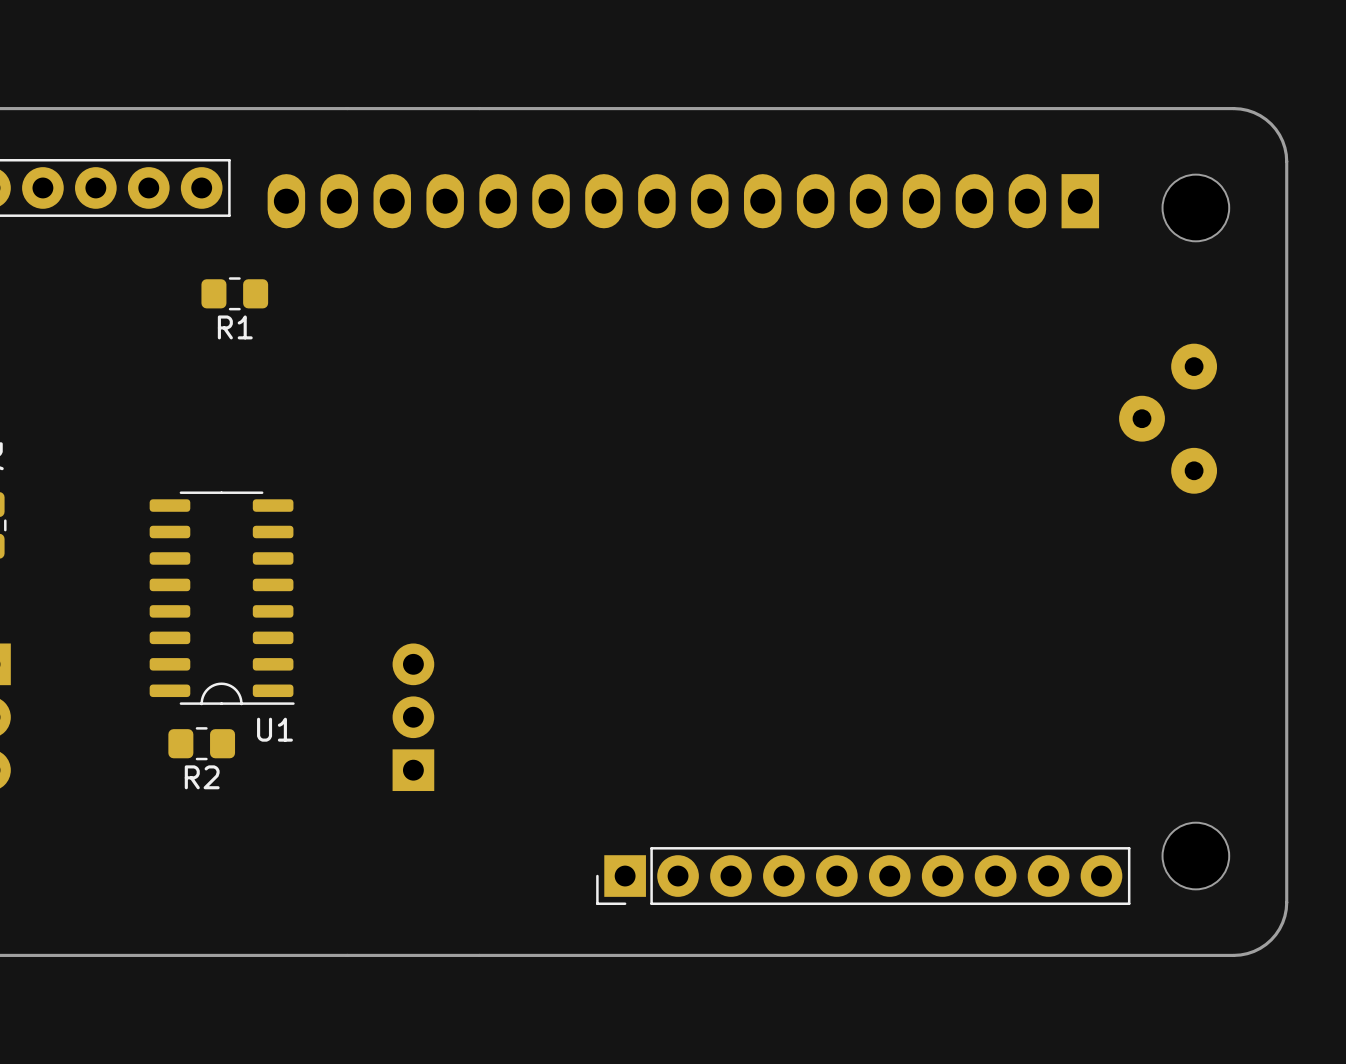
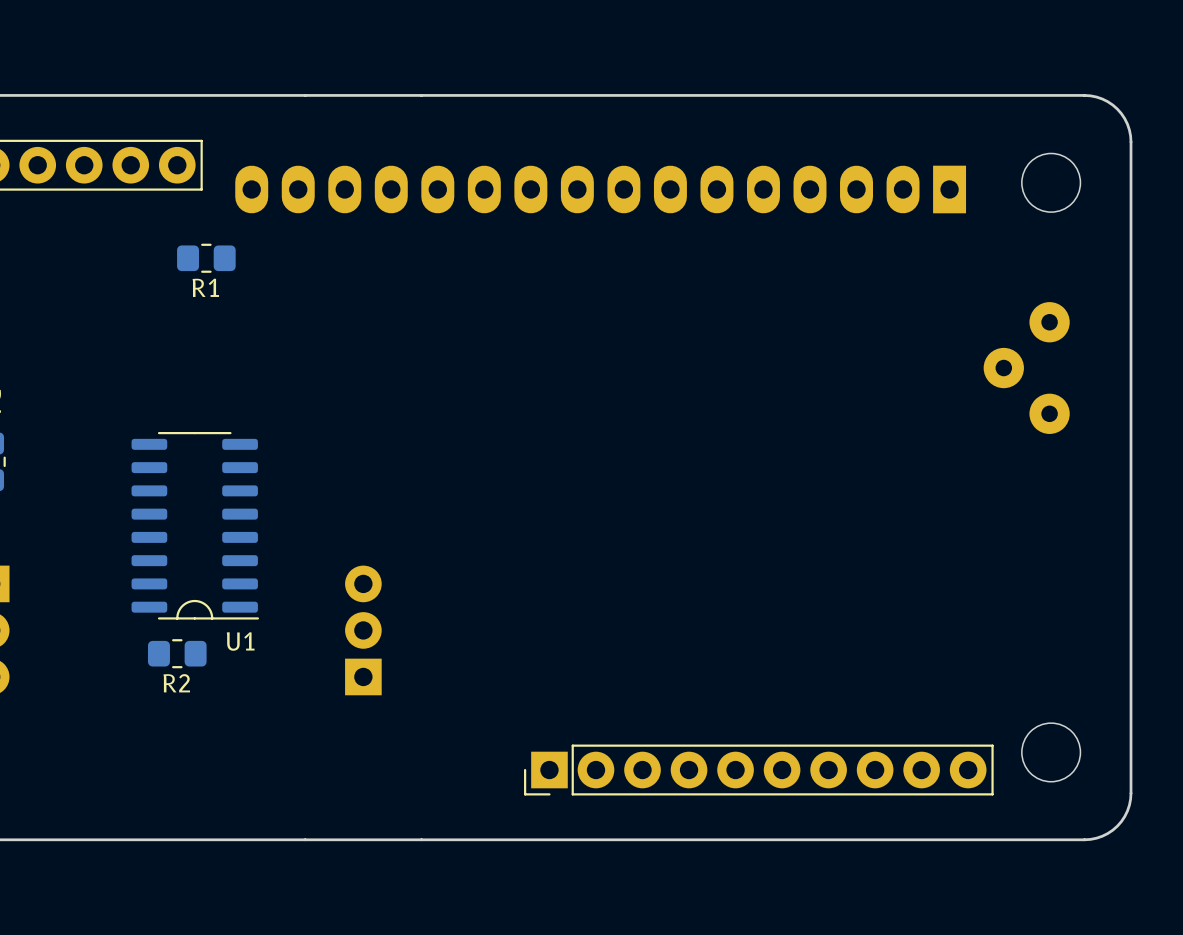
part footprint: [267, 174, 1100, 229] -> [235, 165, 967, 214]

